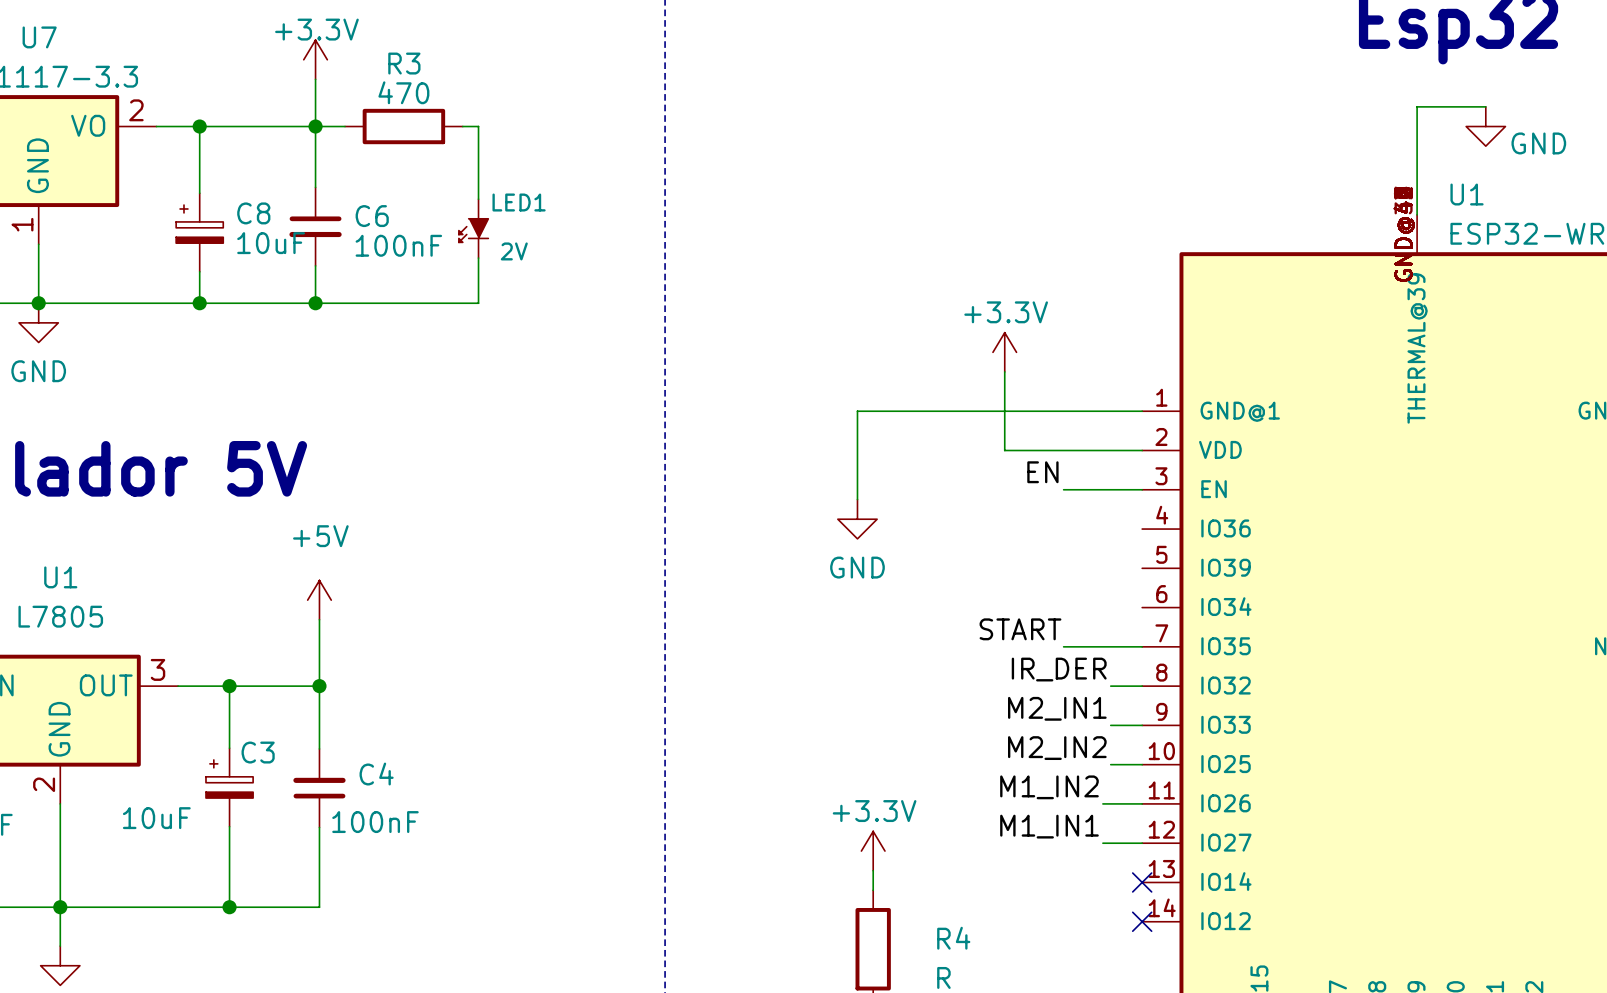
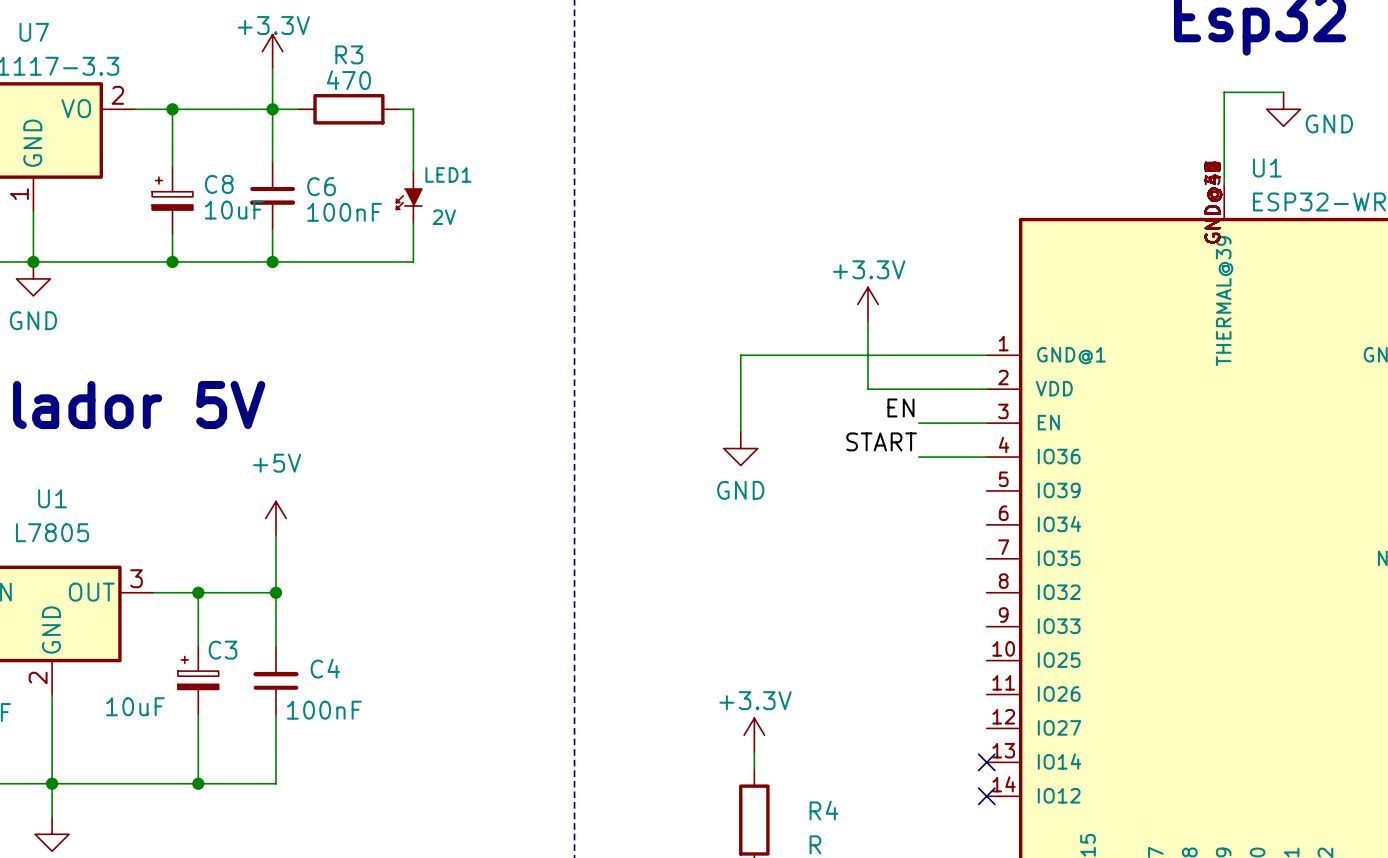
label position: START (1020, 629) -> START (881, 441)
wire: (1063, 646) (1142, 646) -> (918, 457) (986, 457)
label: IR_DER (1059, 669) -> none
wire: (1110, 686) (1142, 686) -> none
label: M2_IN1 (1057, 708) -> none
wire: (1110, 725) (1142, 725) -> none
label: M2_IN2 (1057, 748) -> none
wire: (1110, 764) (1142, 764) -> none
label: M1_IN2 (1049, 787) -> none
wire: (1102, 803) (1142, 803) -> none
label: M1_IN1 (1049, 826) -> none
wire: (1102, 843) (1142, 843) -> none

